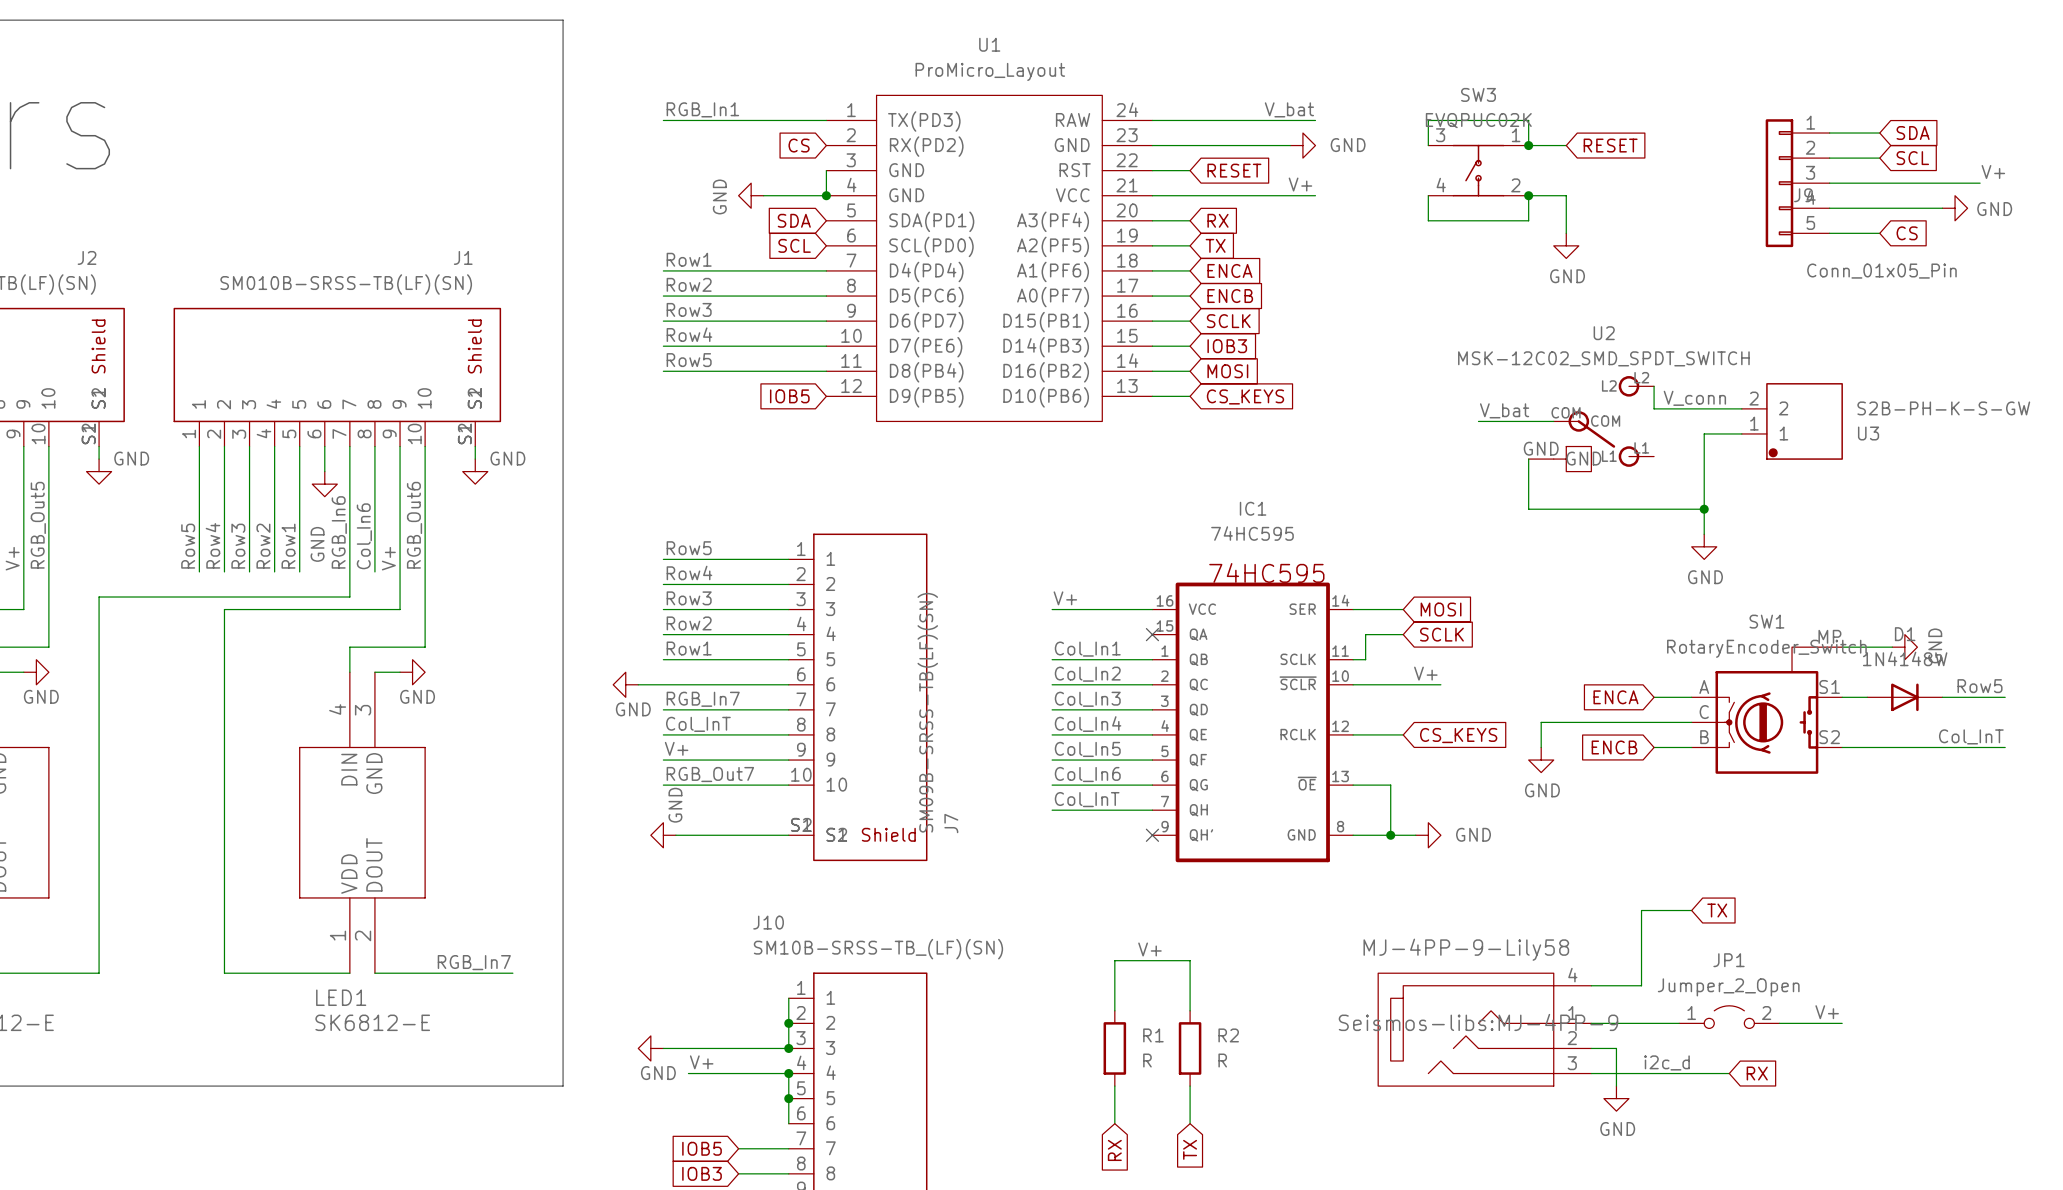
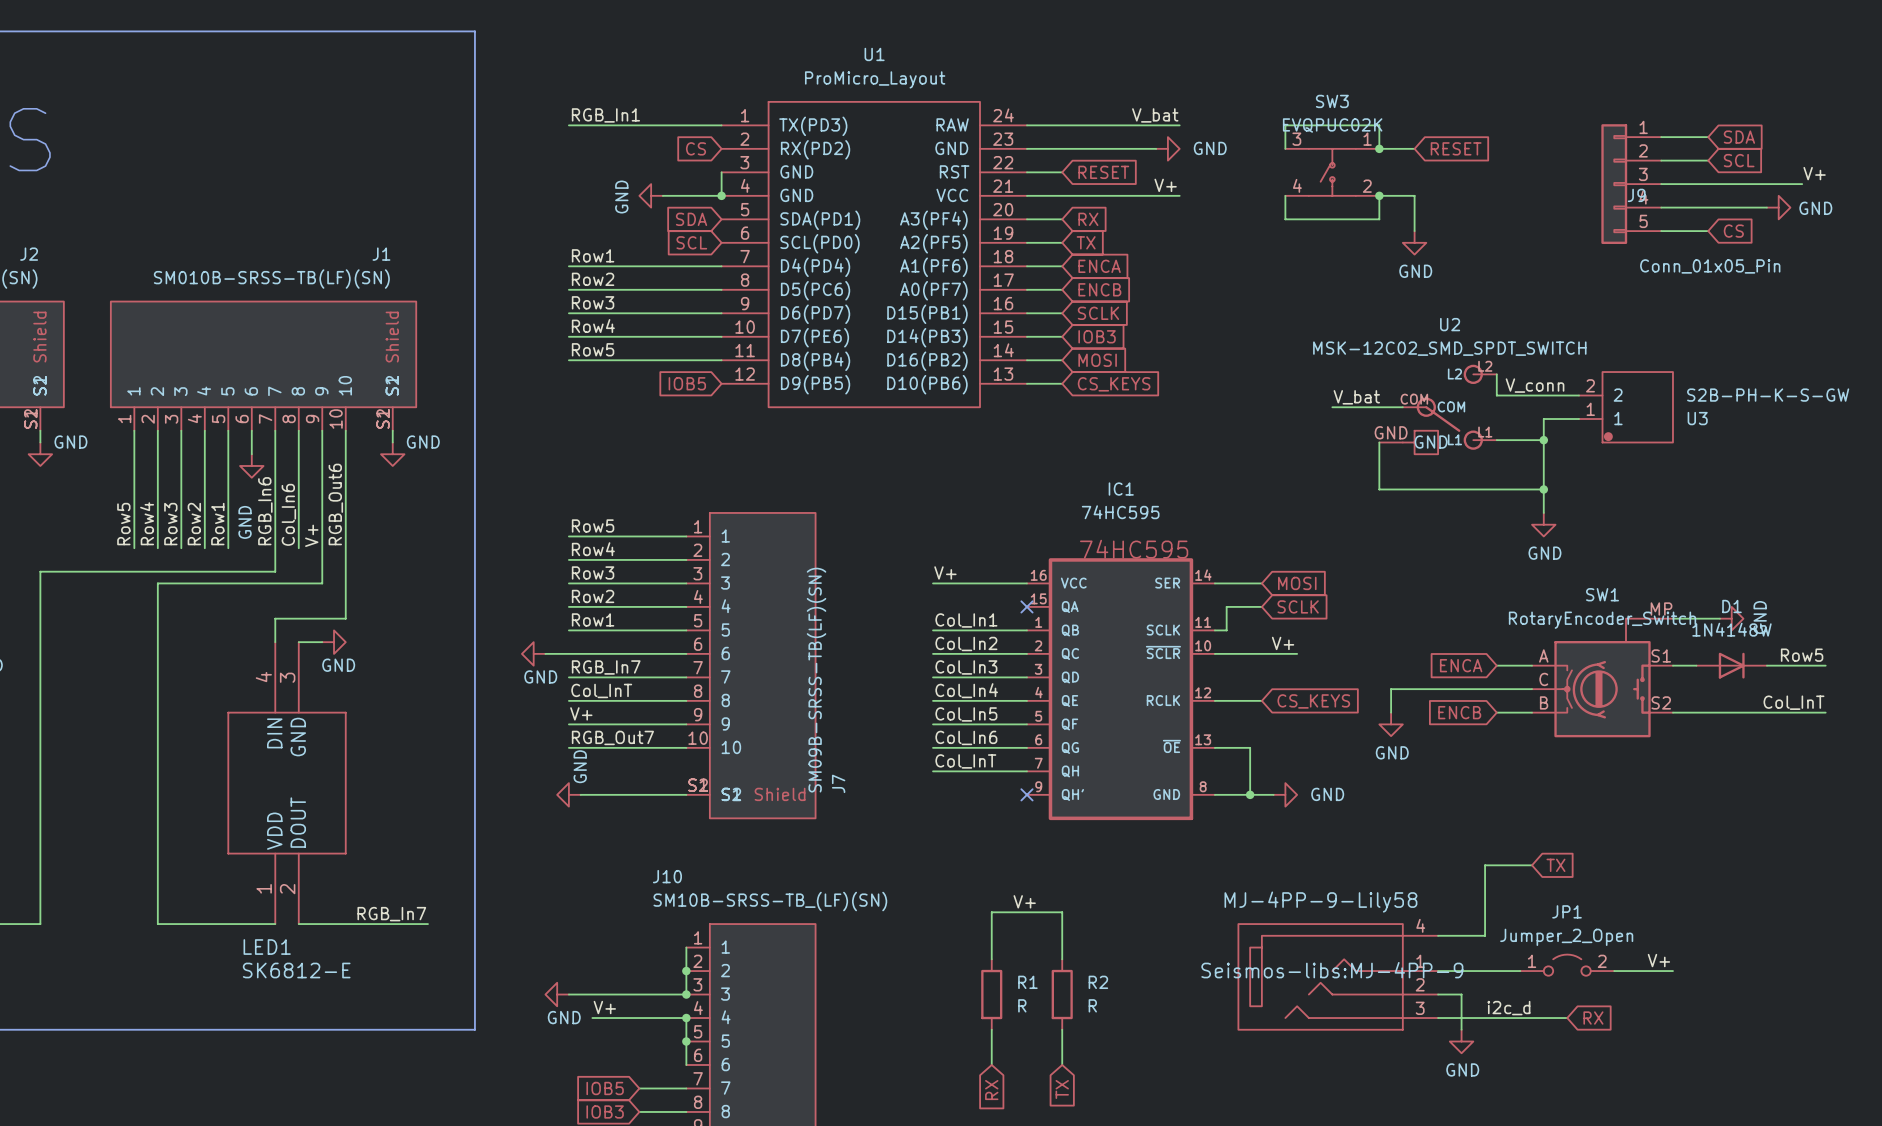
wire: none -> (1496, 440) (1543, 440)
junction: none -> (1543, 440)

